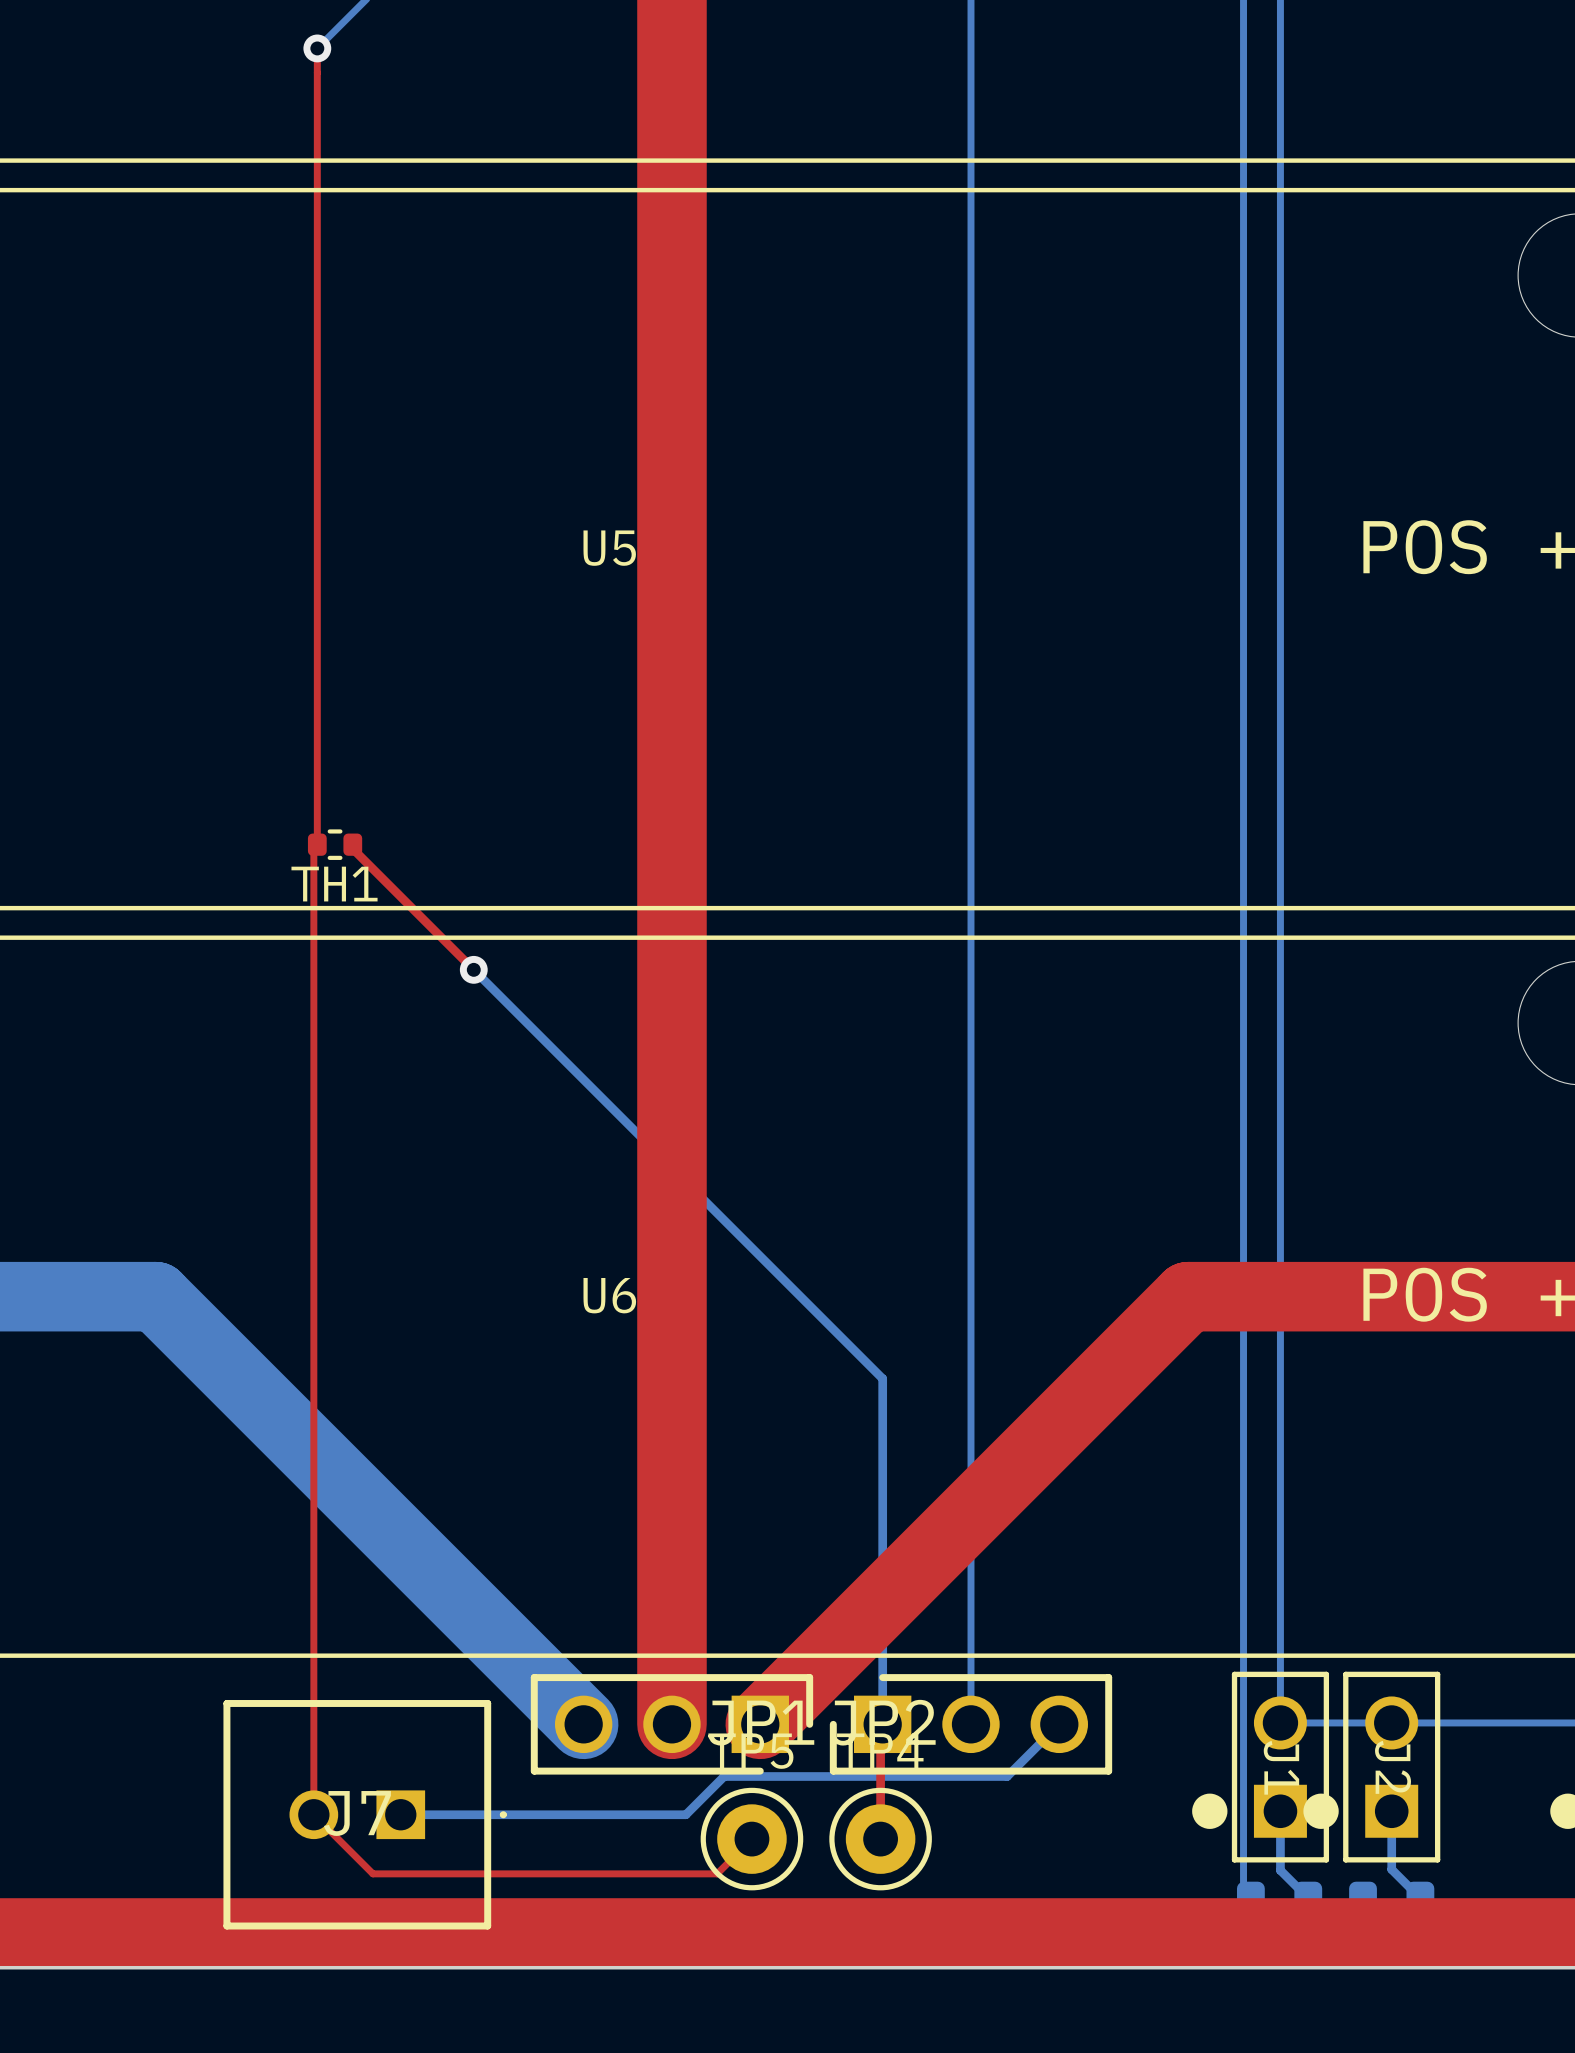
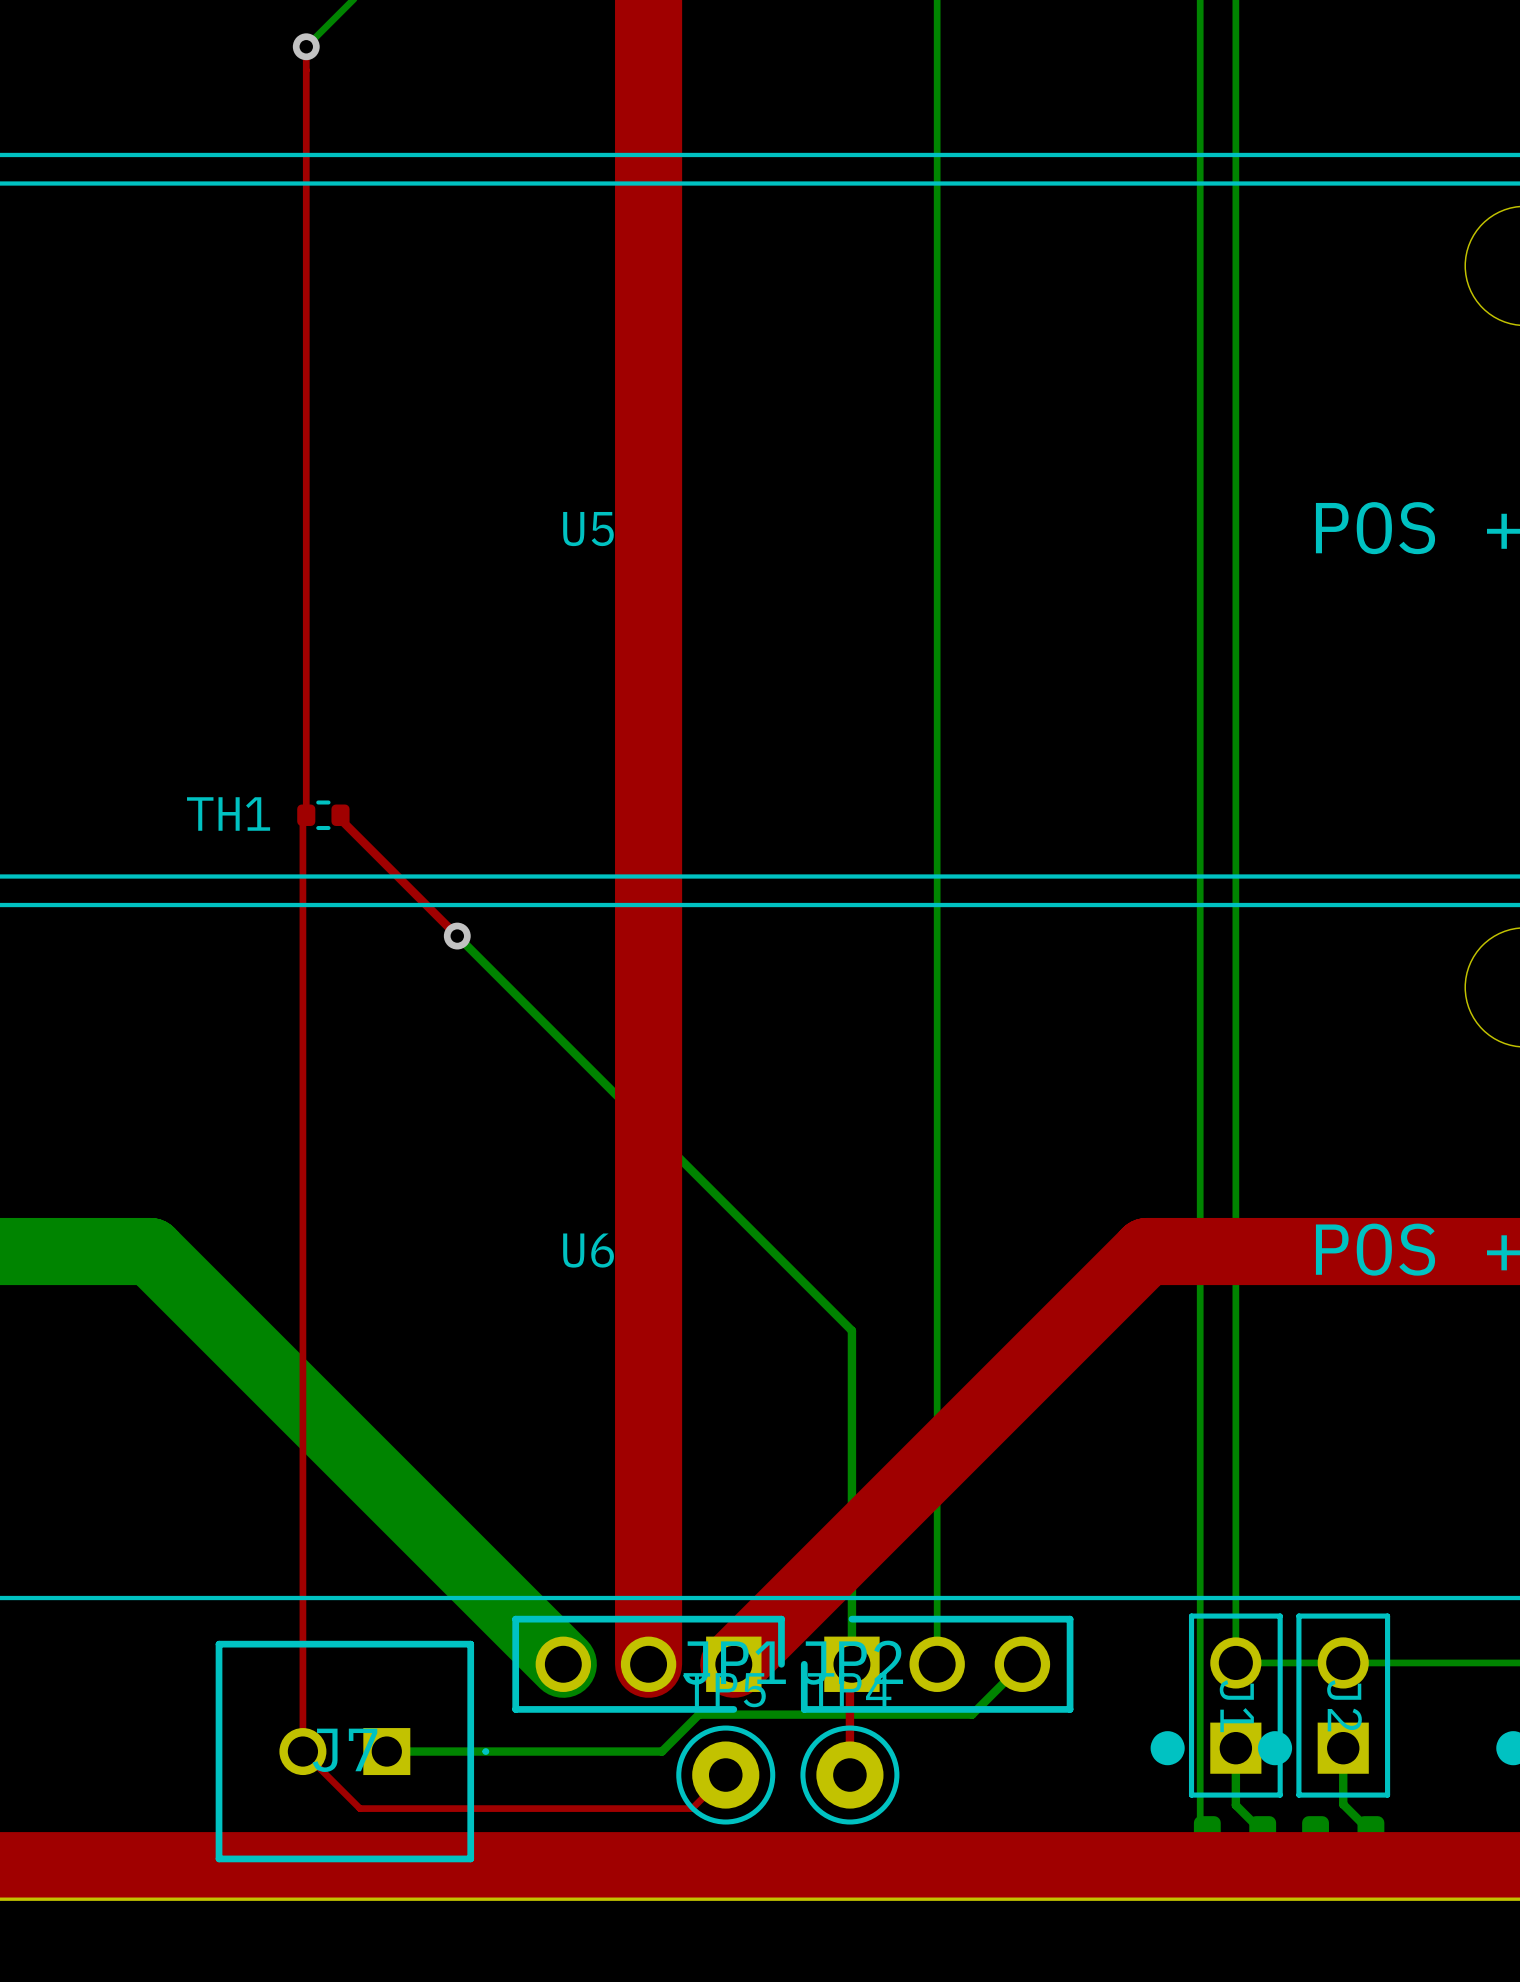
TH1 name position: TH1 (334, 884) -> TH1 (228, 814)

